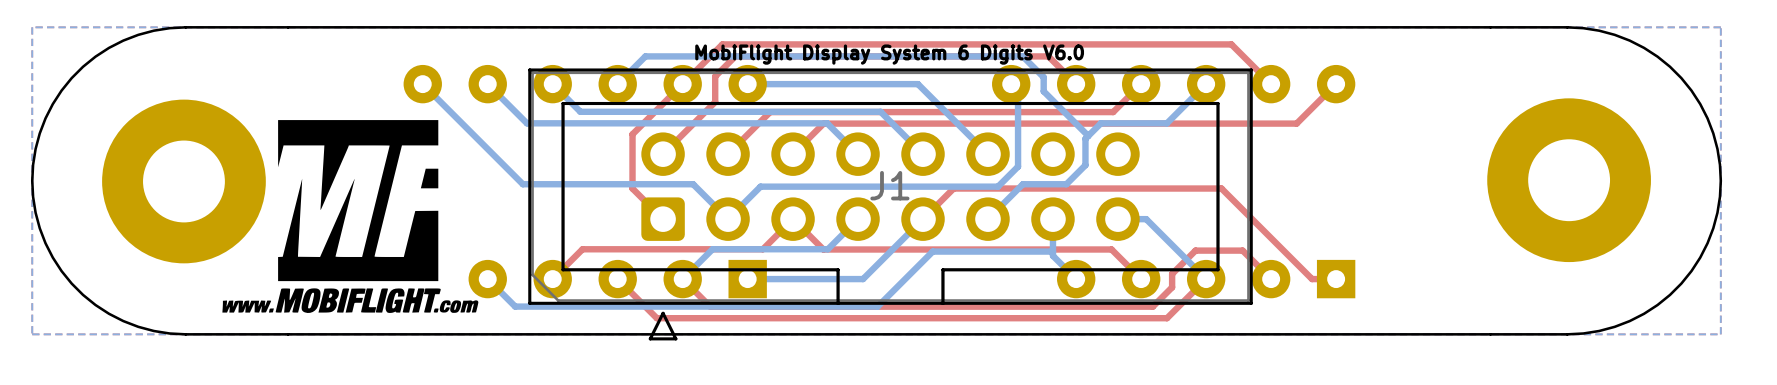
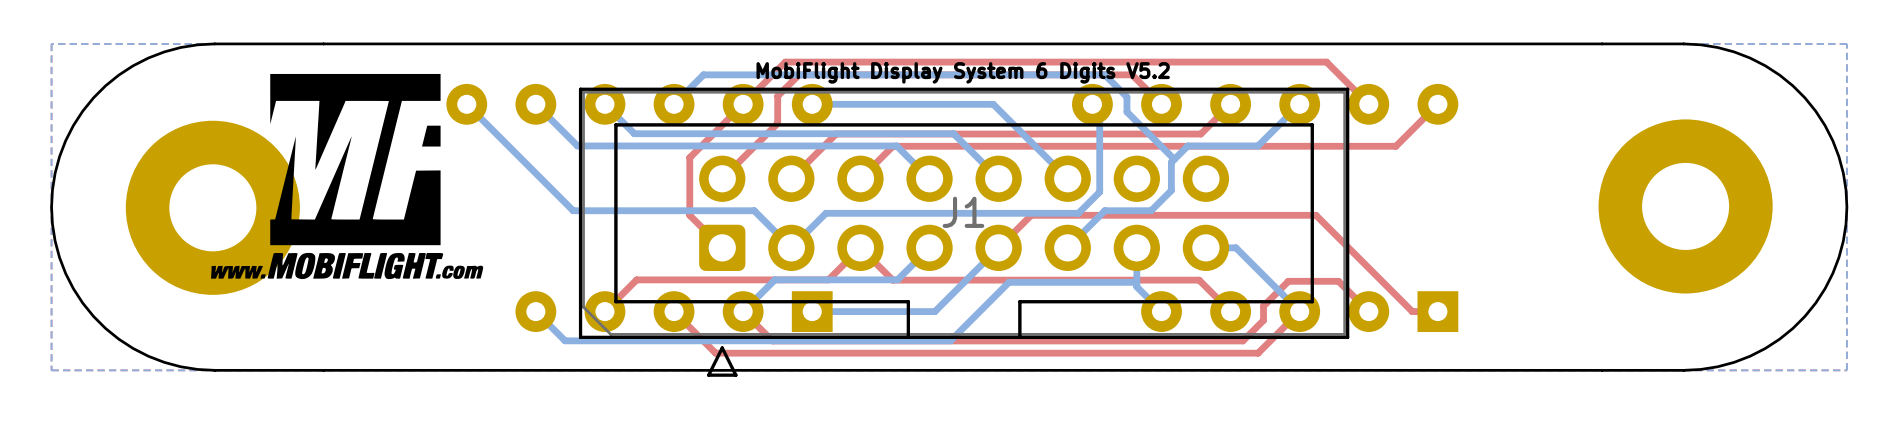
text: MobiFlight Display System 6 Digits V6.0 (889, 54) -> MobiFlight Display System 6 Digits V5.2 (963, 72)
drawing position: (350, 216) -> (347, 176)

